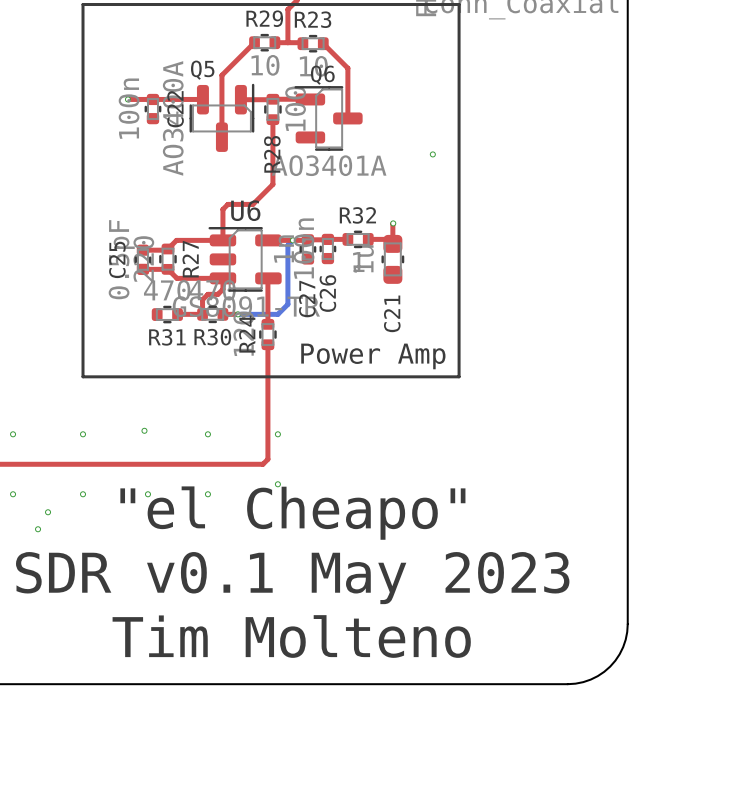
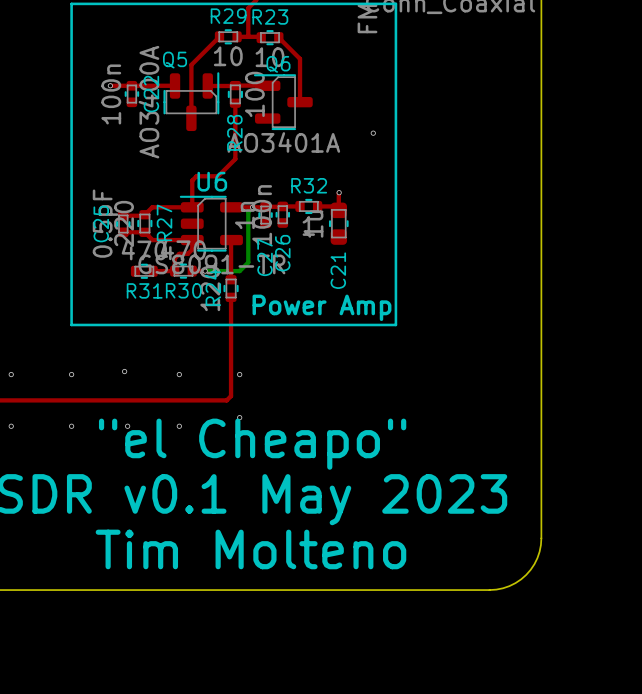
via: (48, 512) -> none
via: (38, 529) -> none

